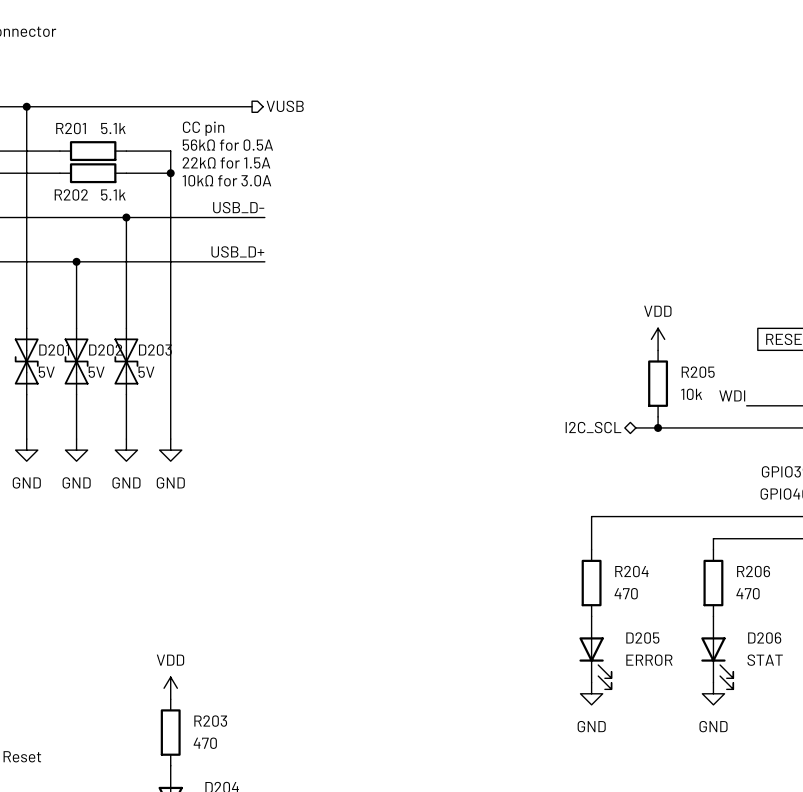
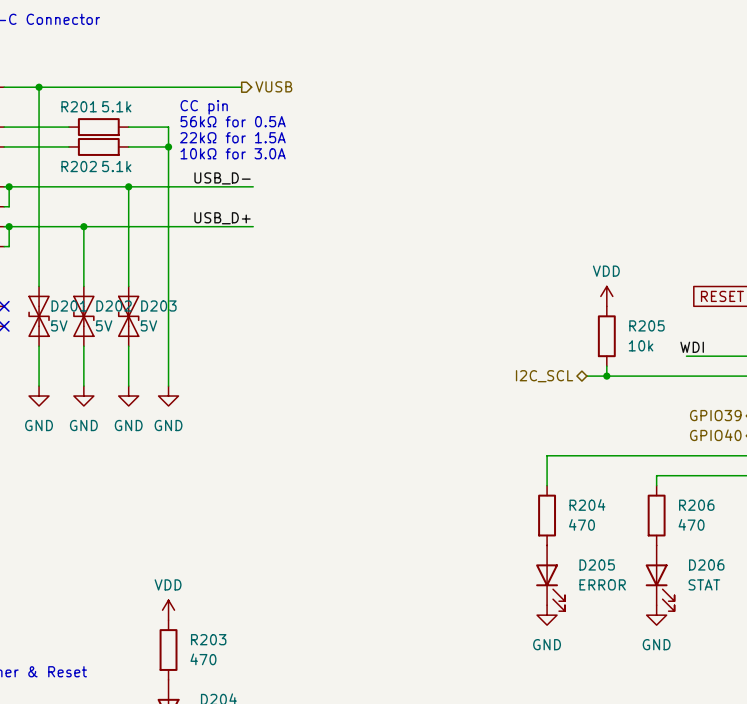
label position: WDI (732, 395) -> WDI (692, 347)

